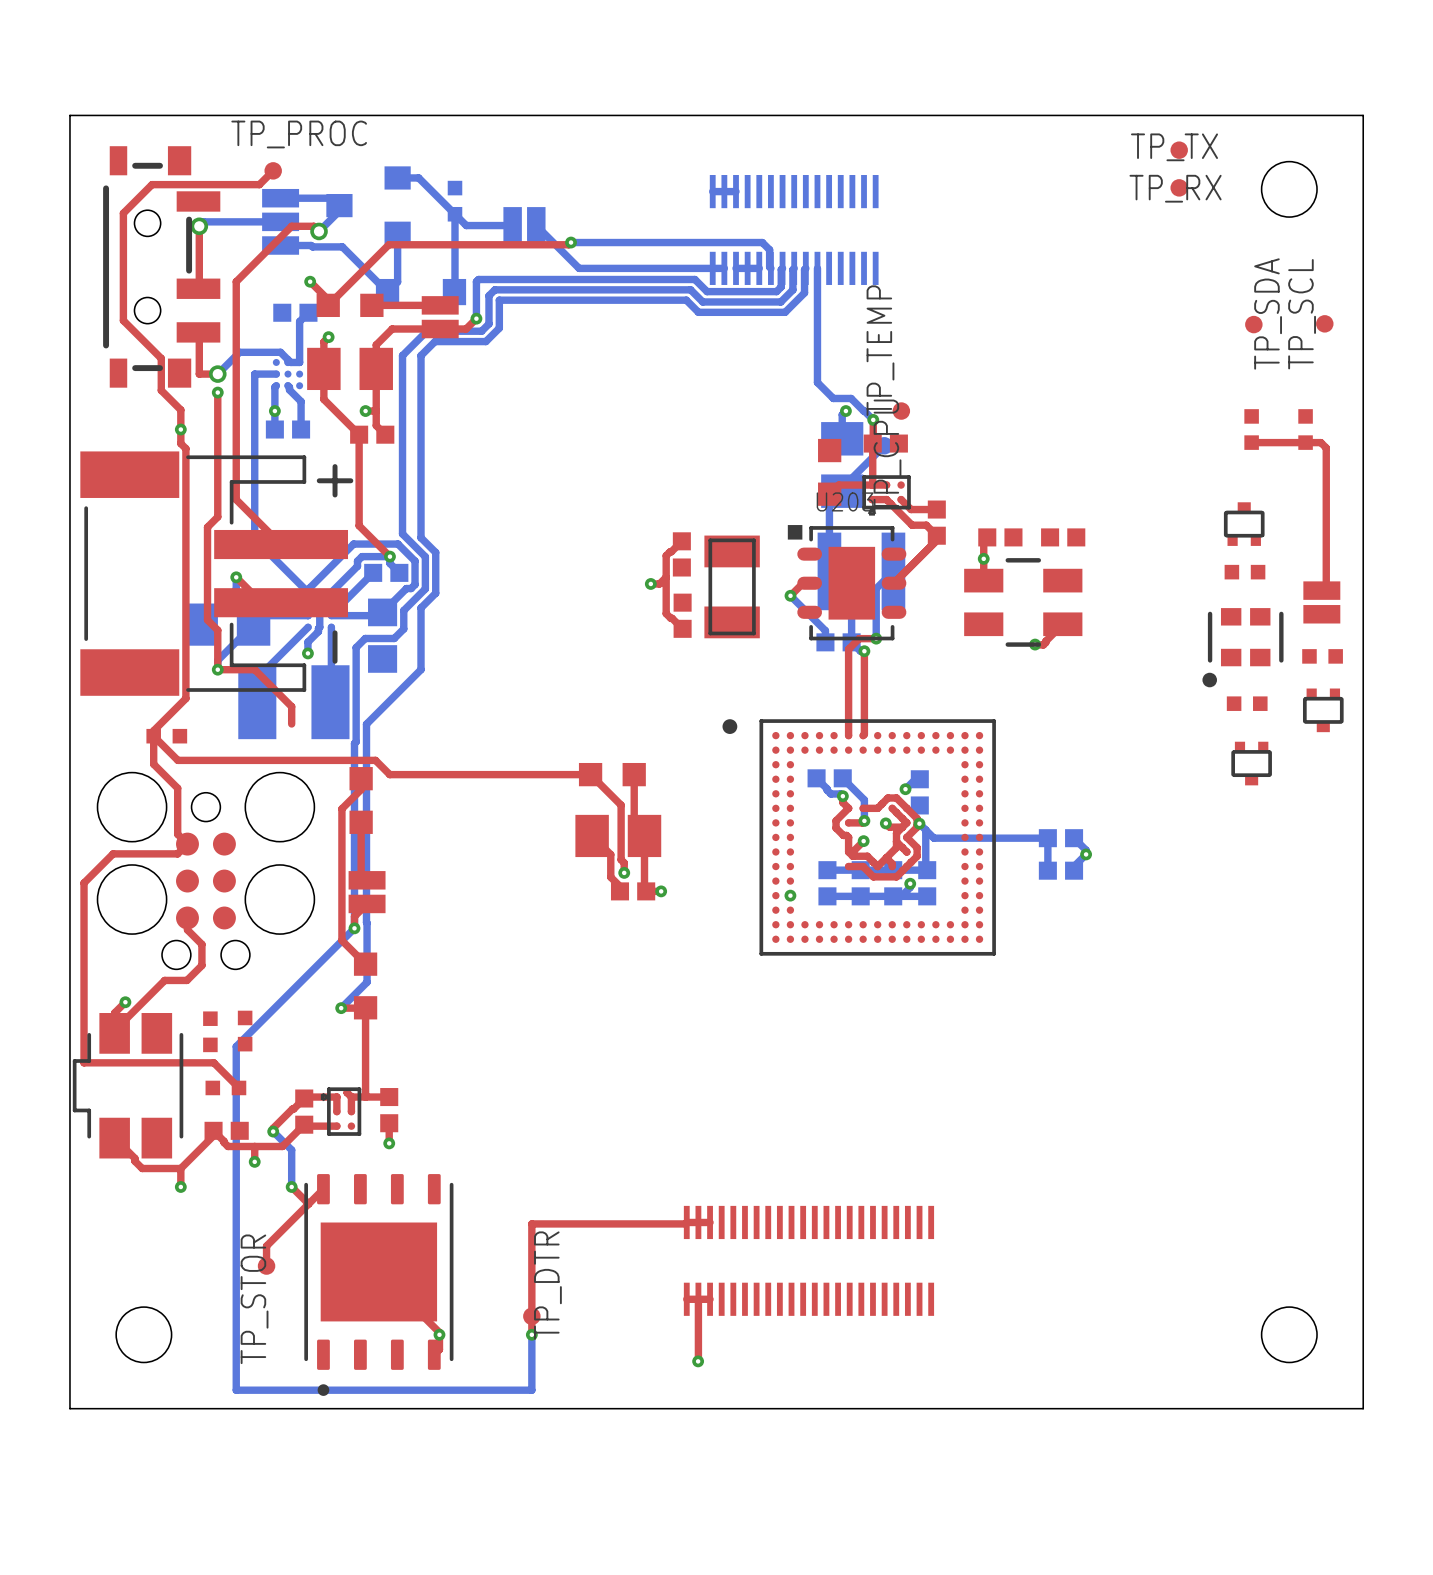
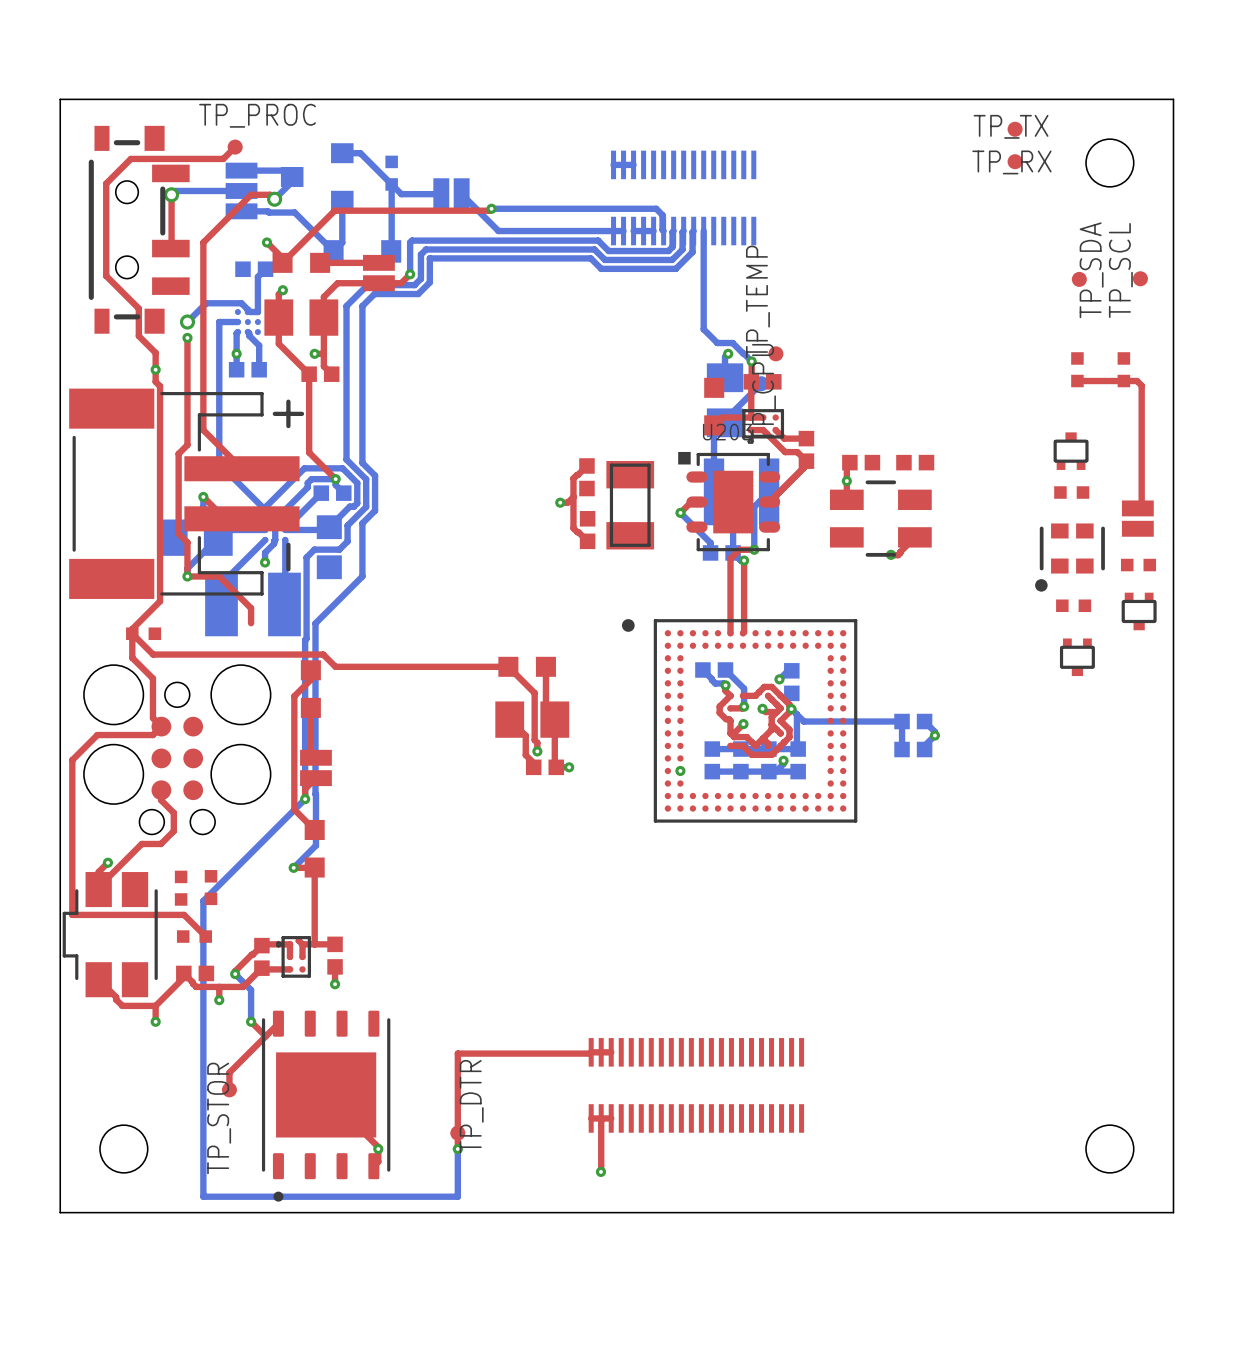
top track: (198, 332) (199, 374) (217, 374) -> none

